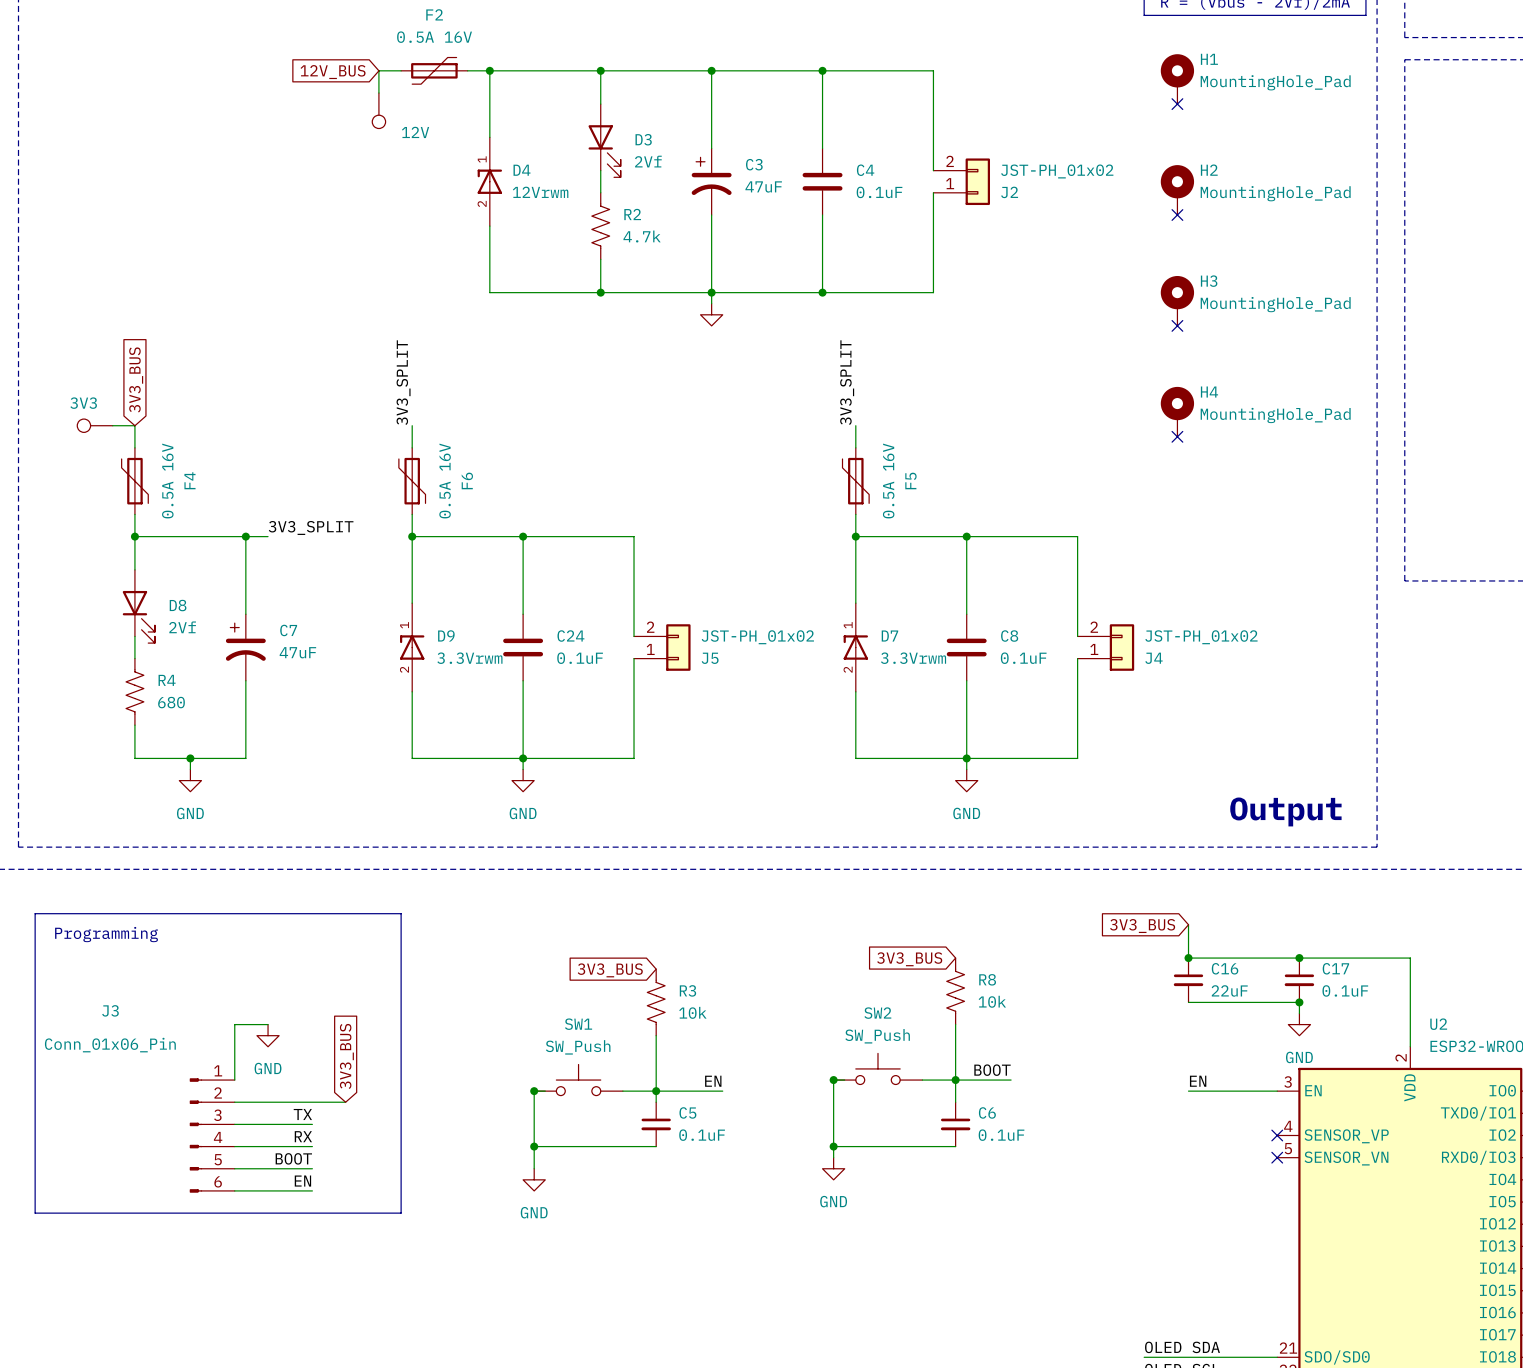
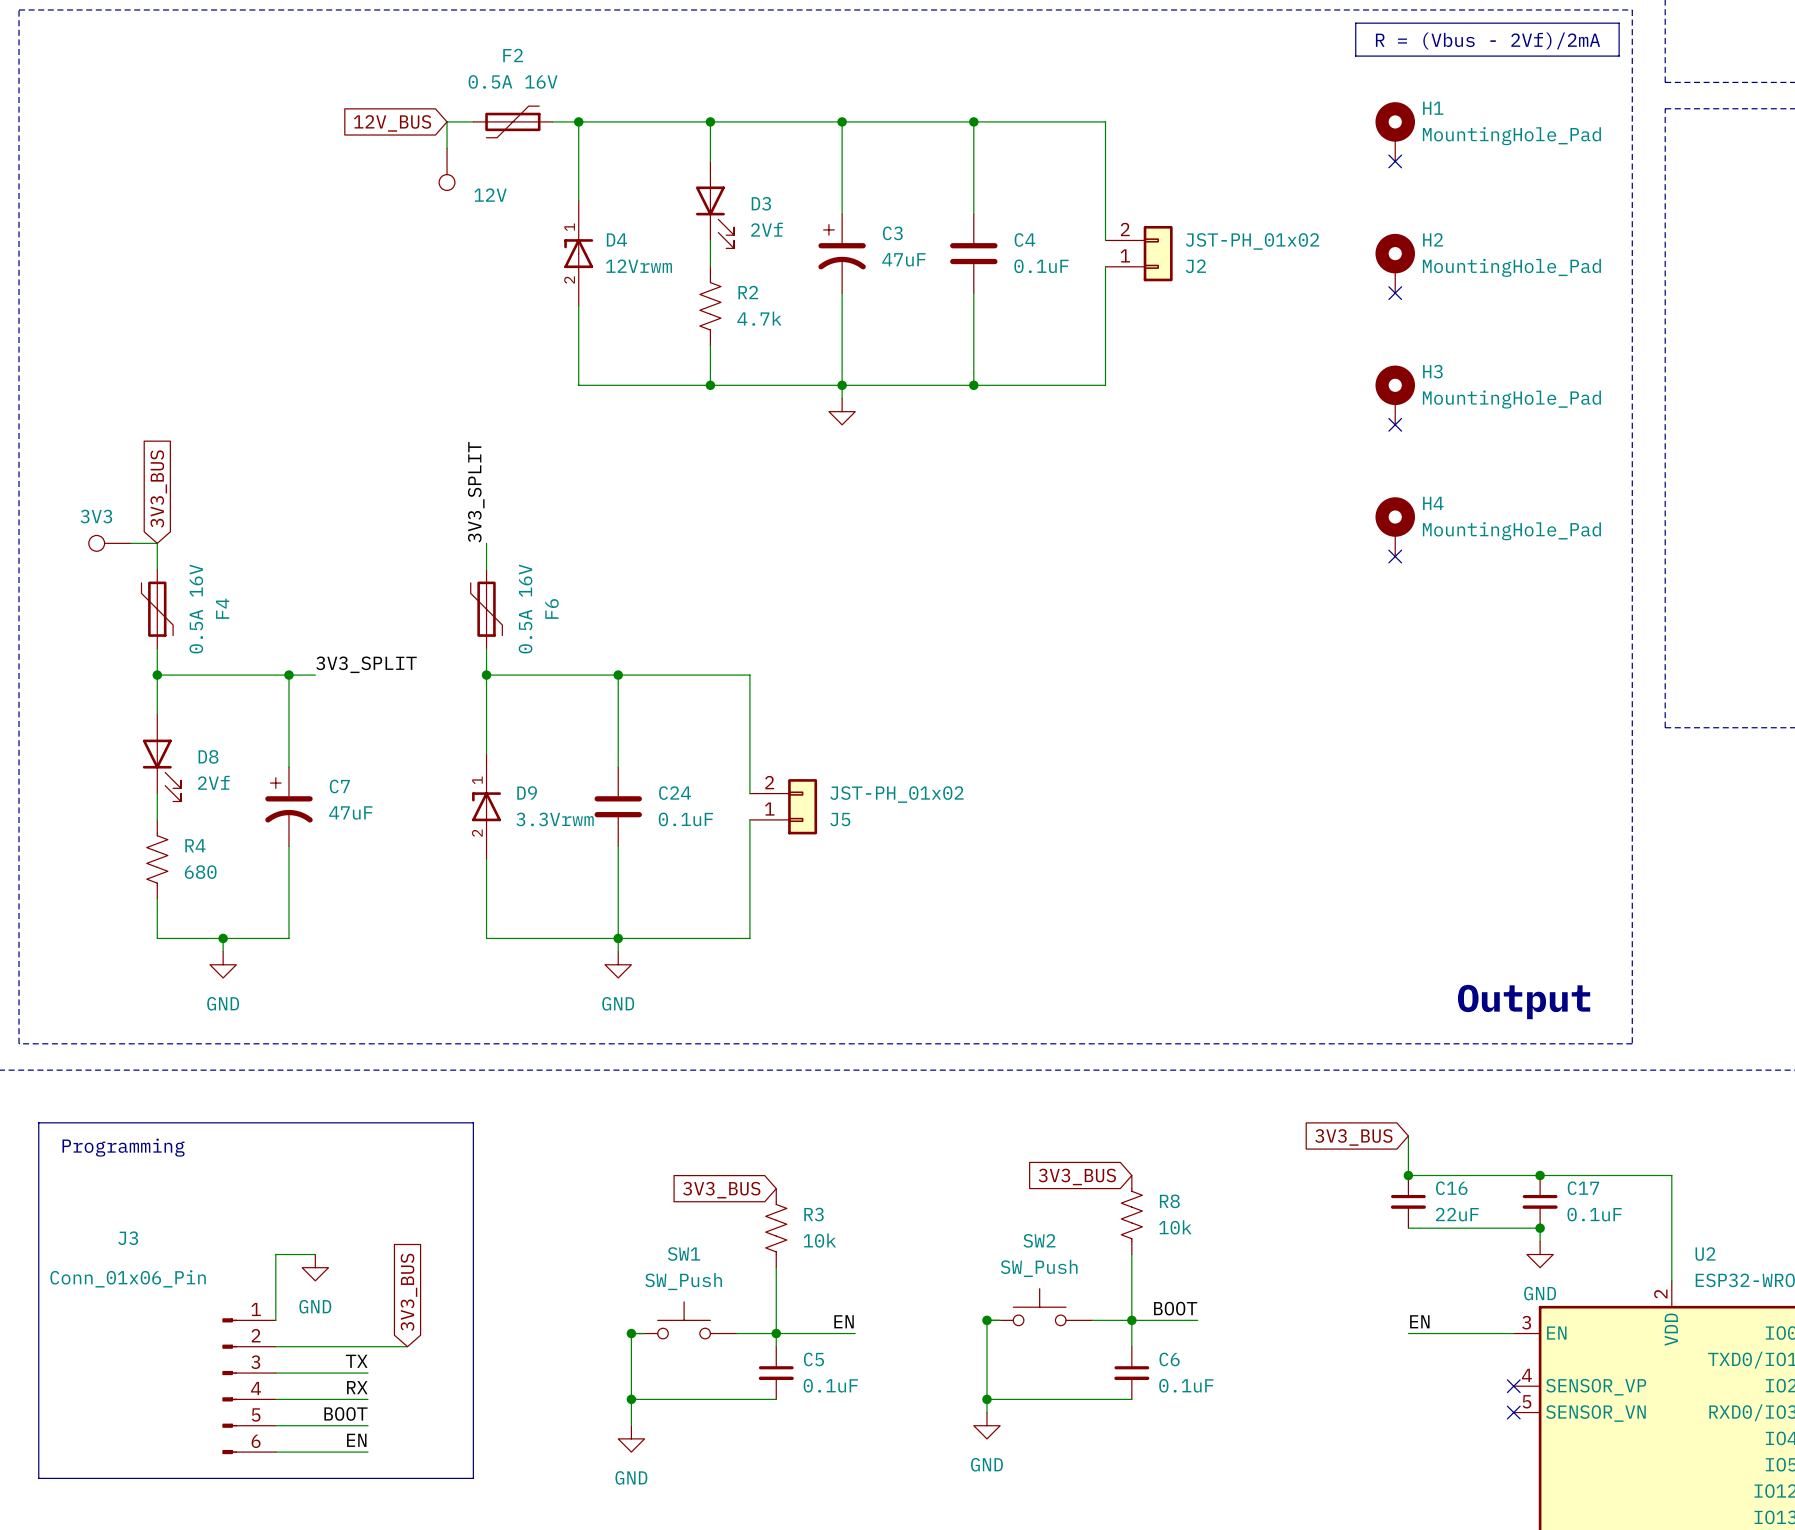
label: 3V3_SPLIT (847, 382) -> none
wire: (855, 425) (855, 447) -> none
F5: 0.5A 16V (855, 481) -> none
wire: (855, 514) (855, 603) -> none
wire: (855, 536) (1077, 536) (1077, 636) -> none
junction: (855, 536) -> none
wire: (966, 536) (966, 614) -> none
junction: (966, 536) -> none
D7: 3.3Vrwm (855, 647) -> none
C8: 0.1uF (966, 647) -> none
J4: JST-PH_01x02 (1105, 647) -> none
wire: (1077, 658) (1077, 758) (855, 758) (855, 691) -> none
wire: (966, 680) (966, 769) -> none
junction: (966, 758) -> none
power symbol: GND (966, 780) -> none

